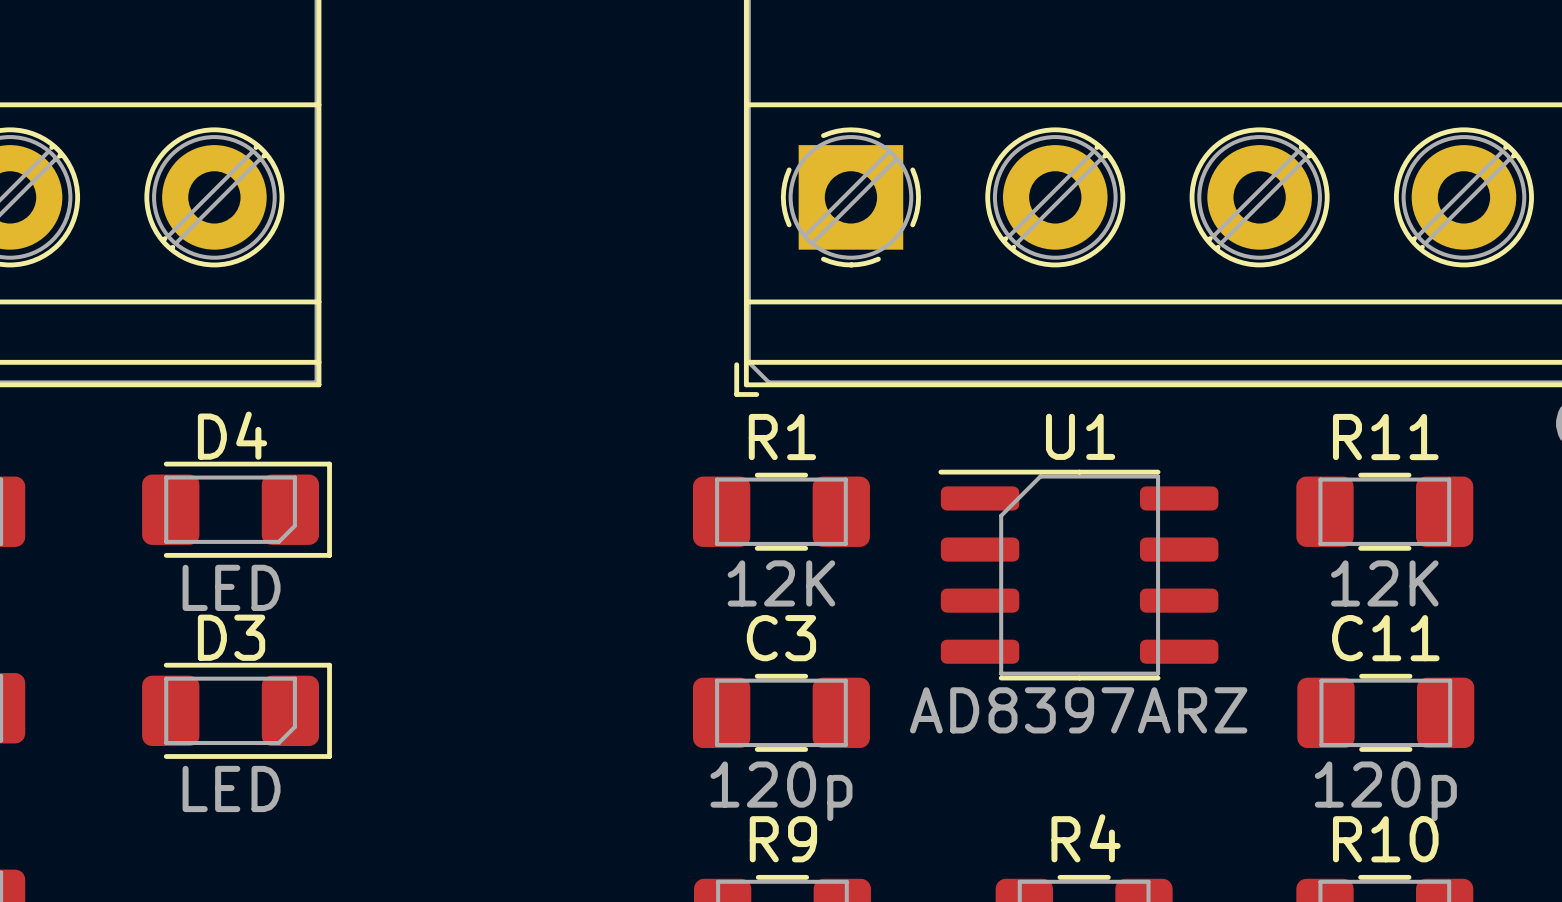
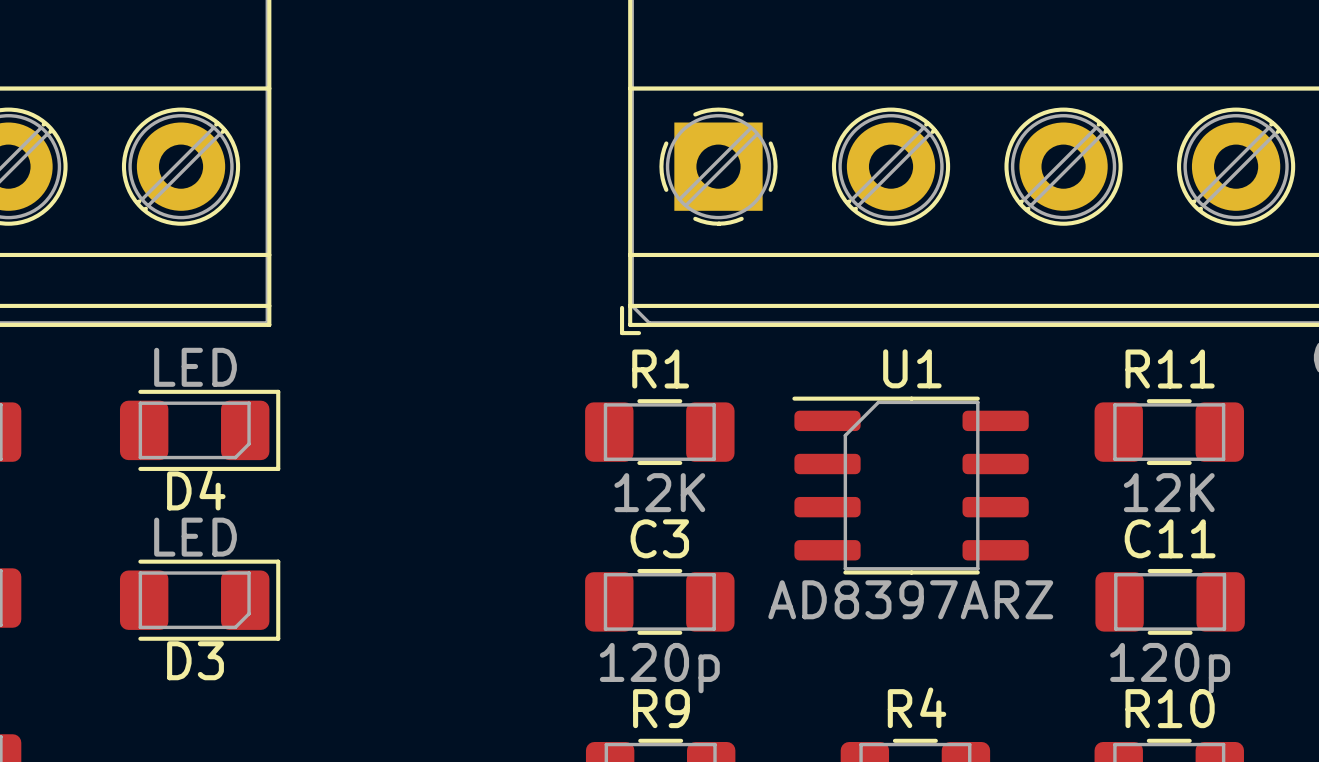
D4 name position: D4 (232, 435) -> D4 (196, 490)
D4 value position: LED (231, 587) -> LED (195, 367)
D3 name position: D3 (231, 637) -> D3 (195, 660)
D3 value position: LED (231, 788) -> LED (195, 537)

